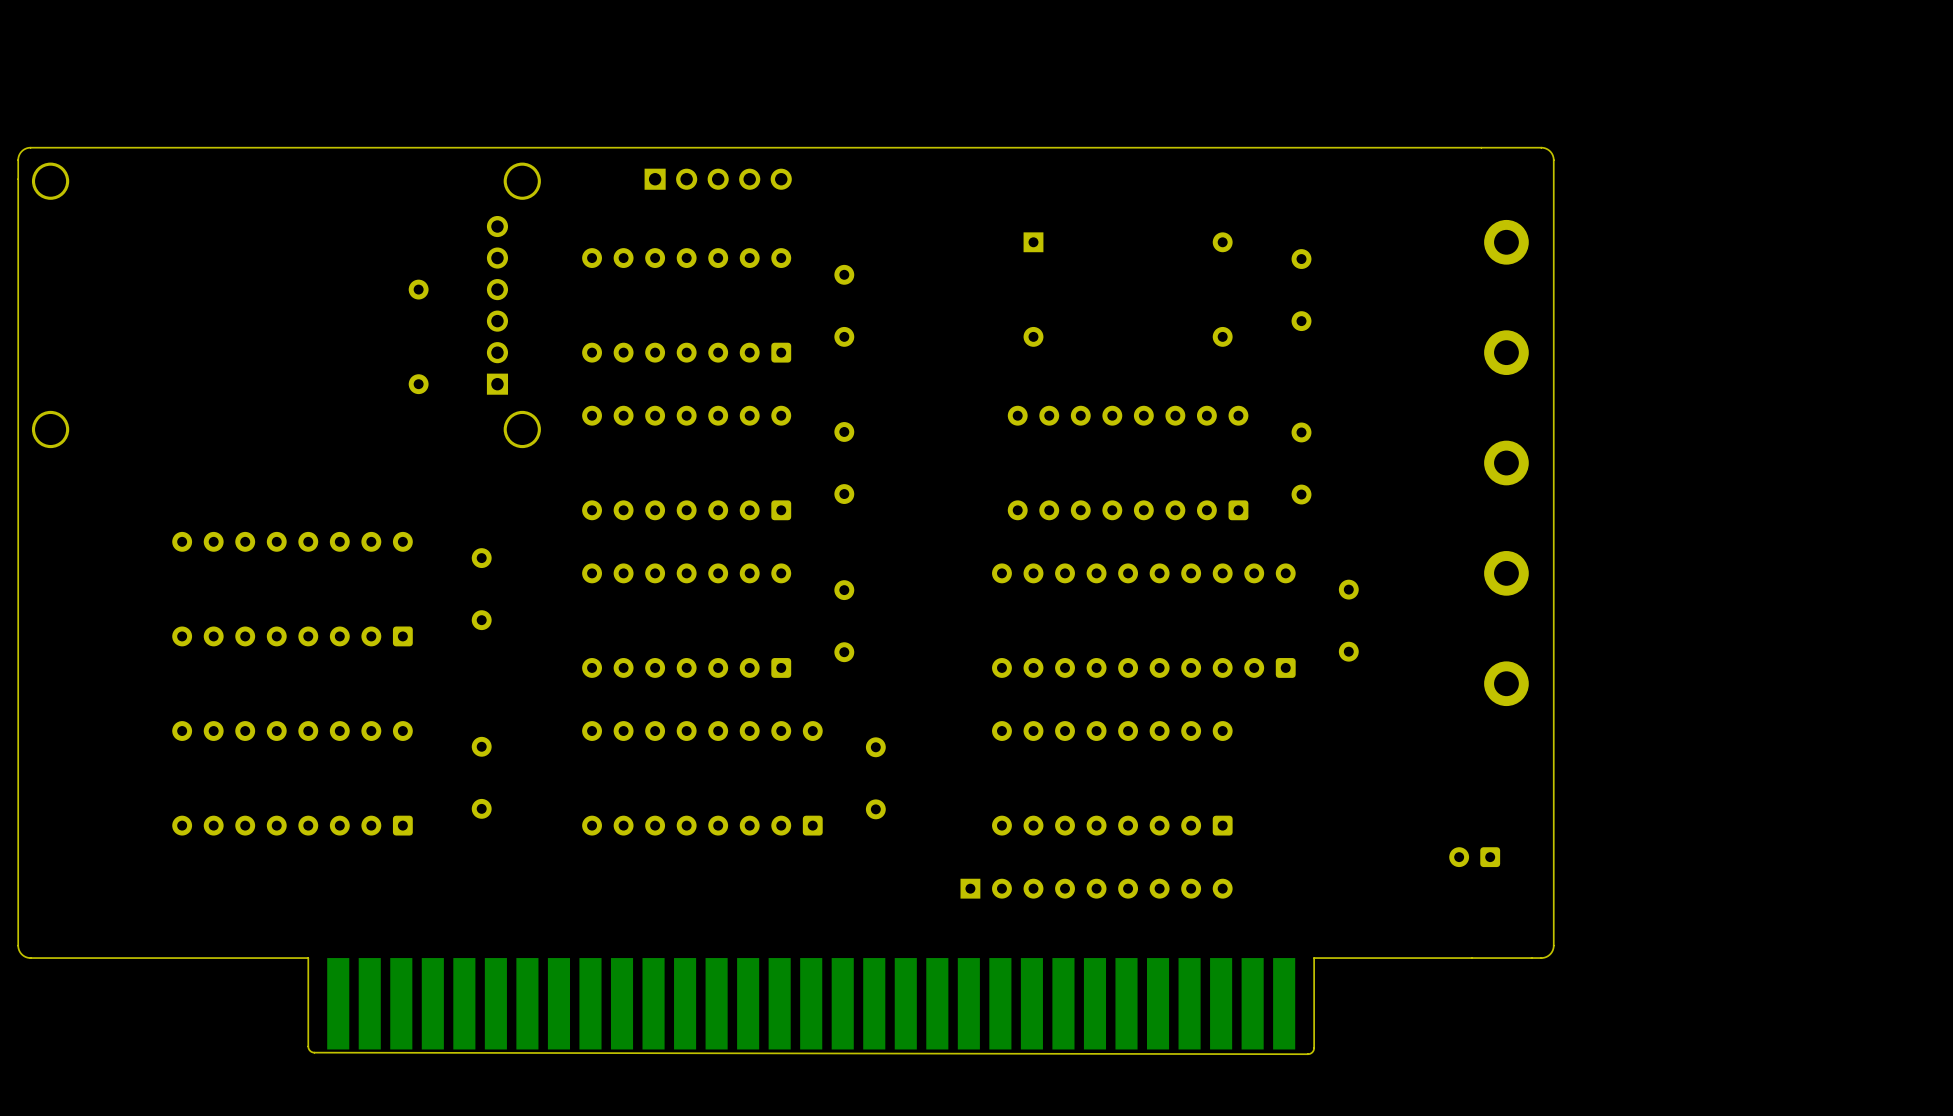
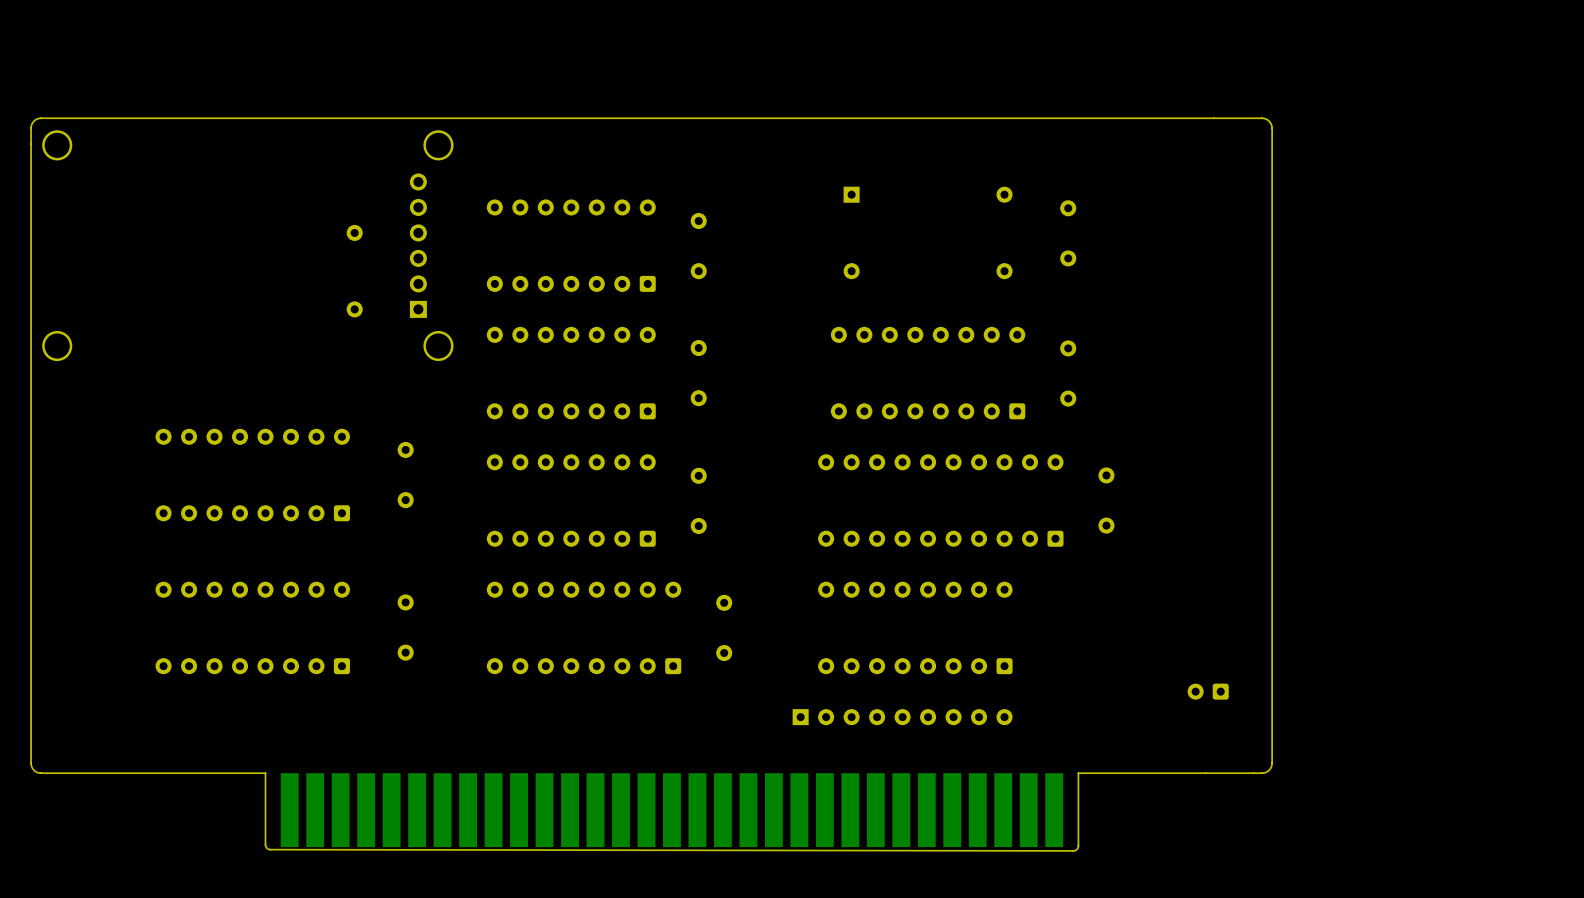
part: (718, 179) -> none
part: (1506, 242) -> none
part: (1506, 352) -> none
part: (1506, 463) -> none
part: (1506, 573) -> none
part: (1506, 683) -> none

